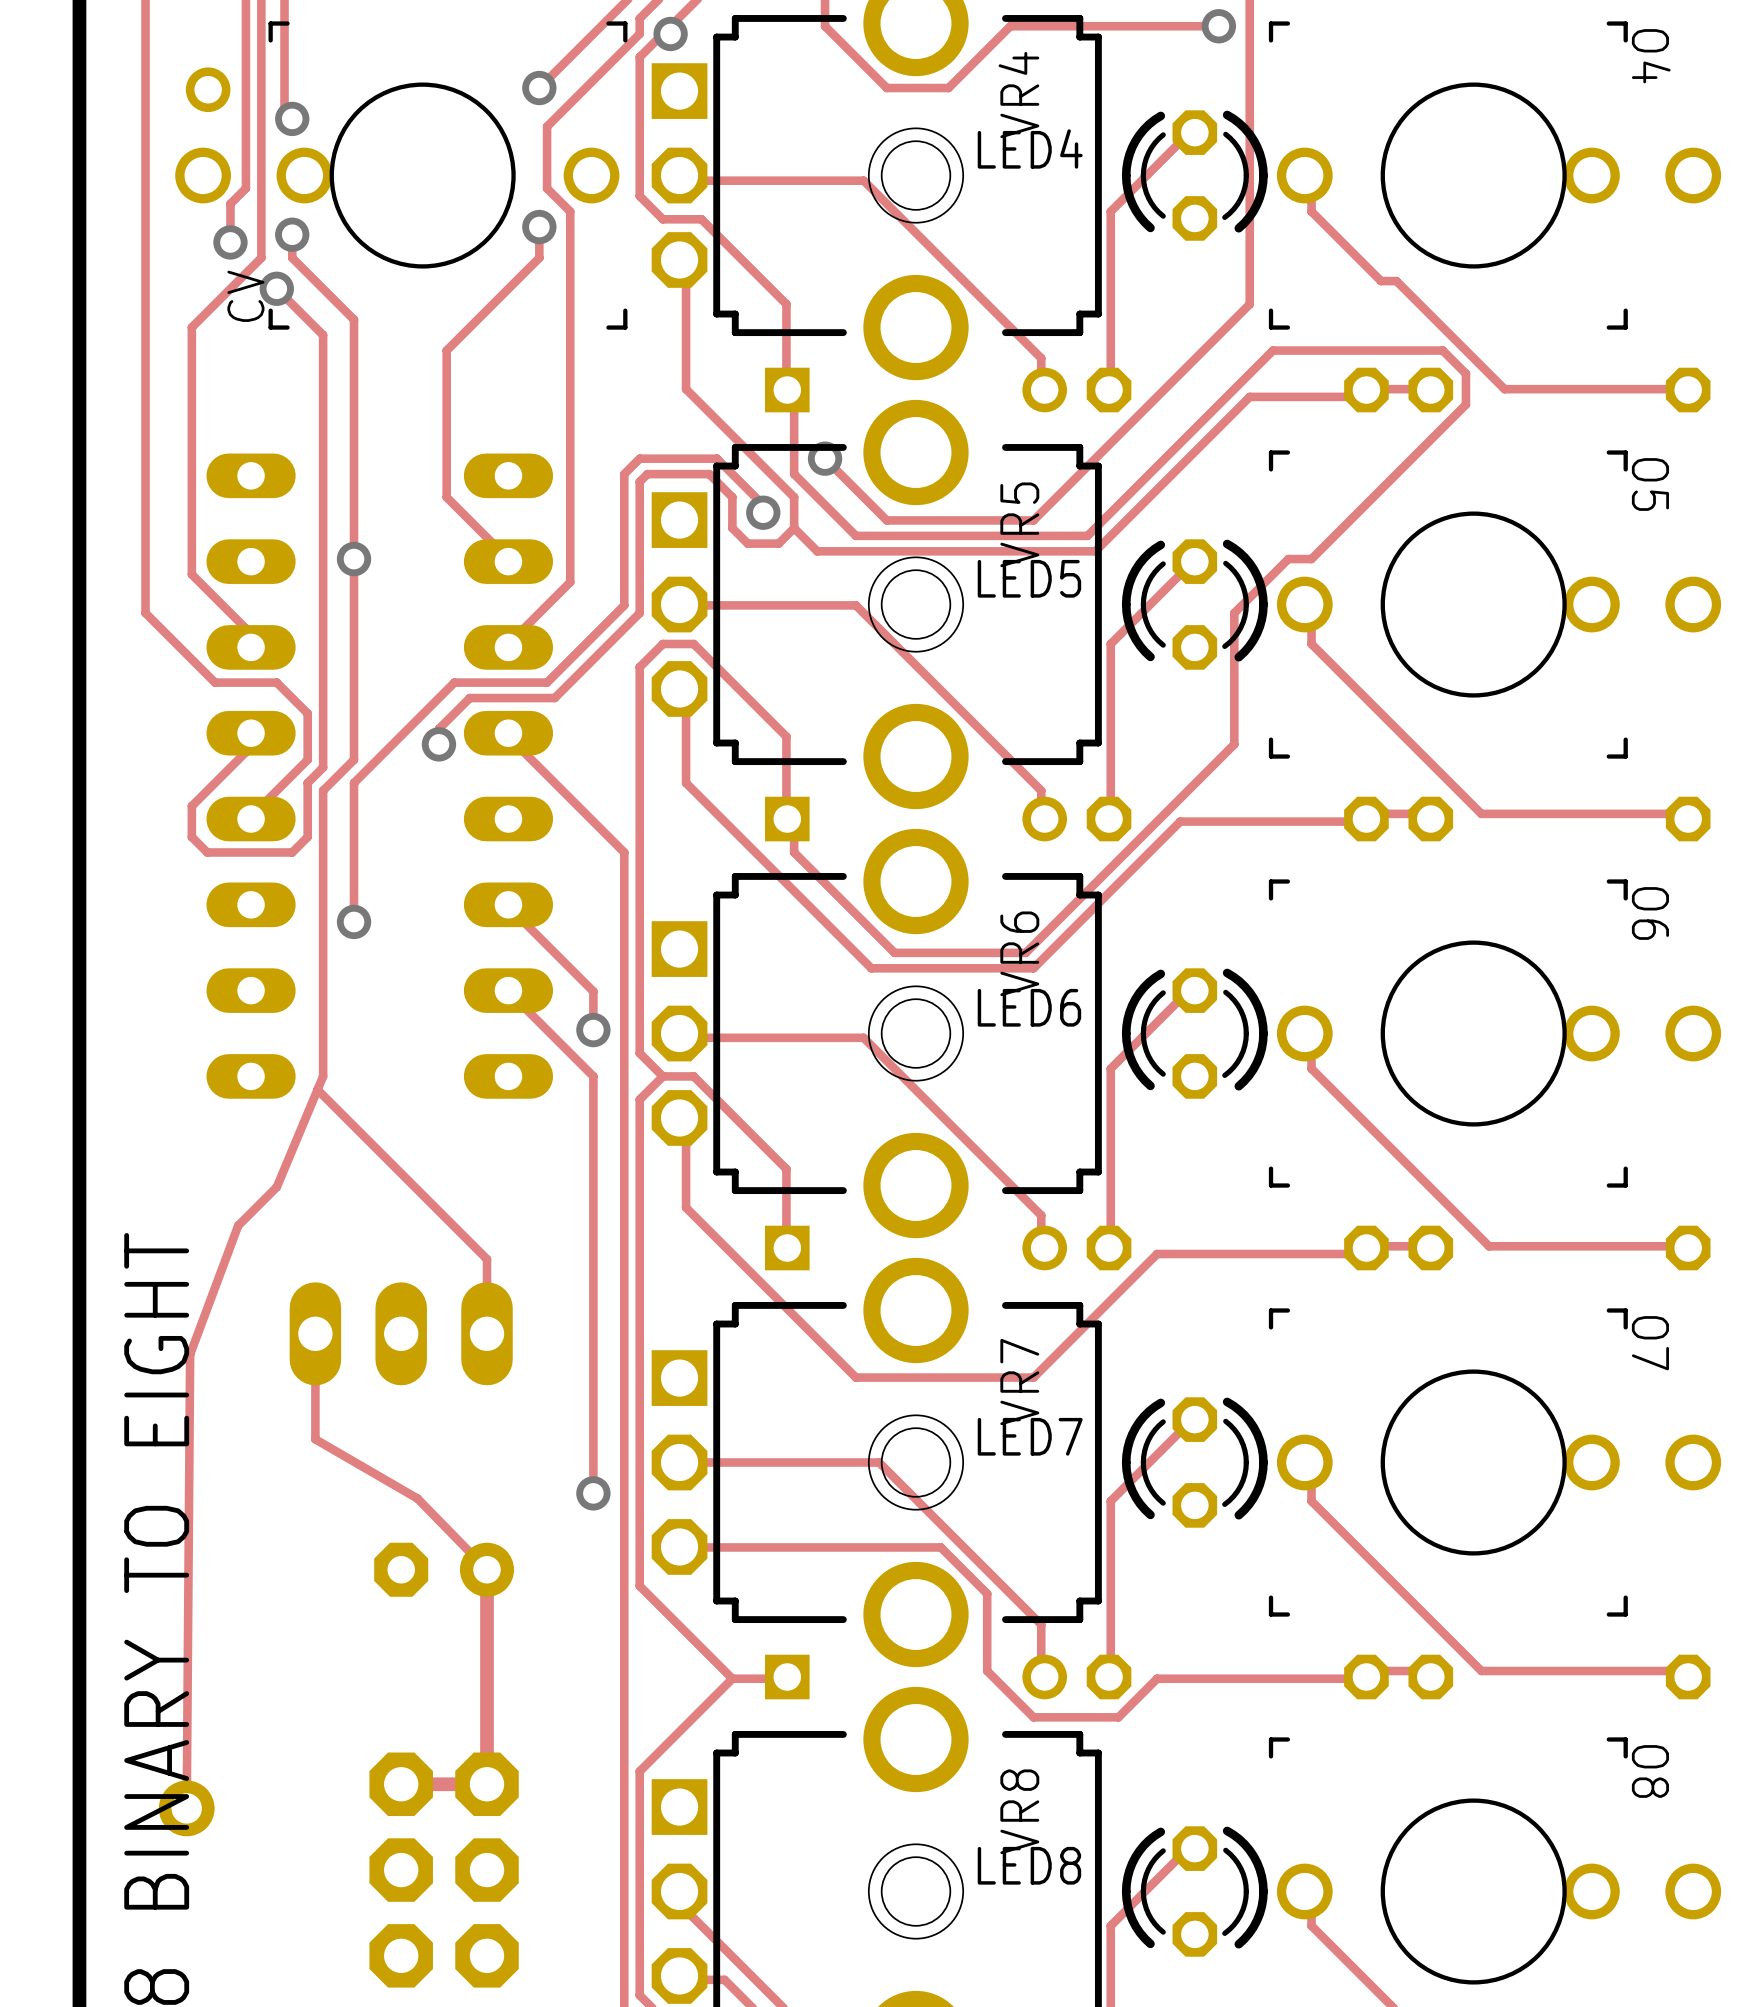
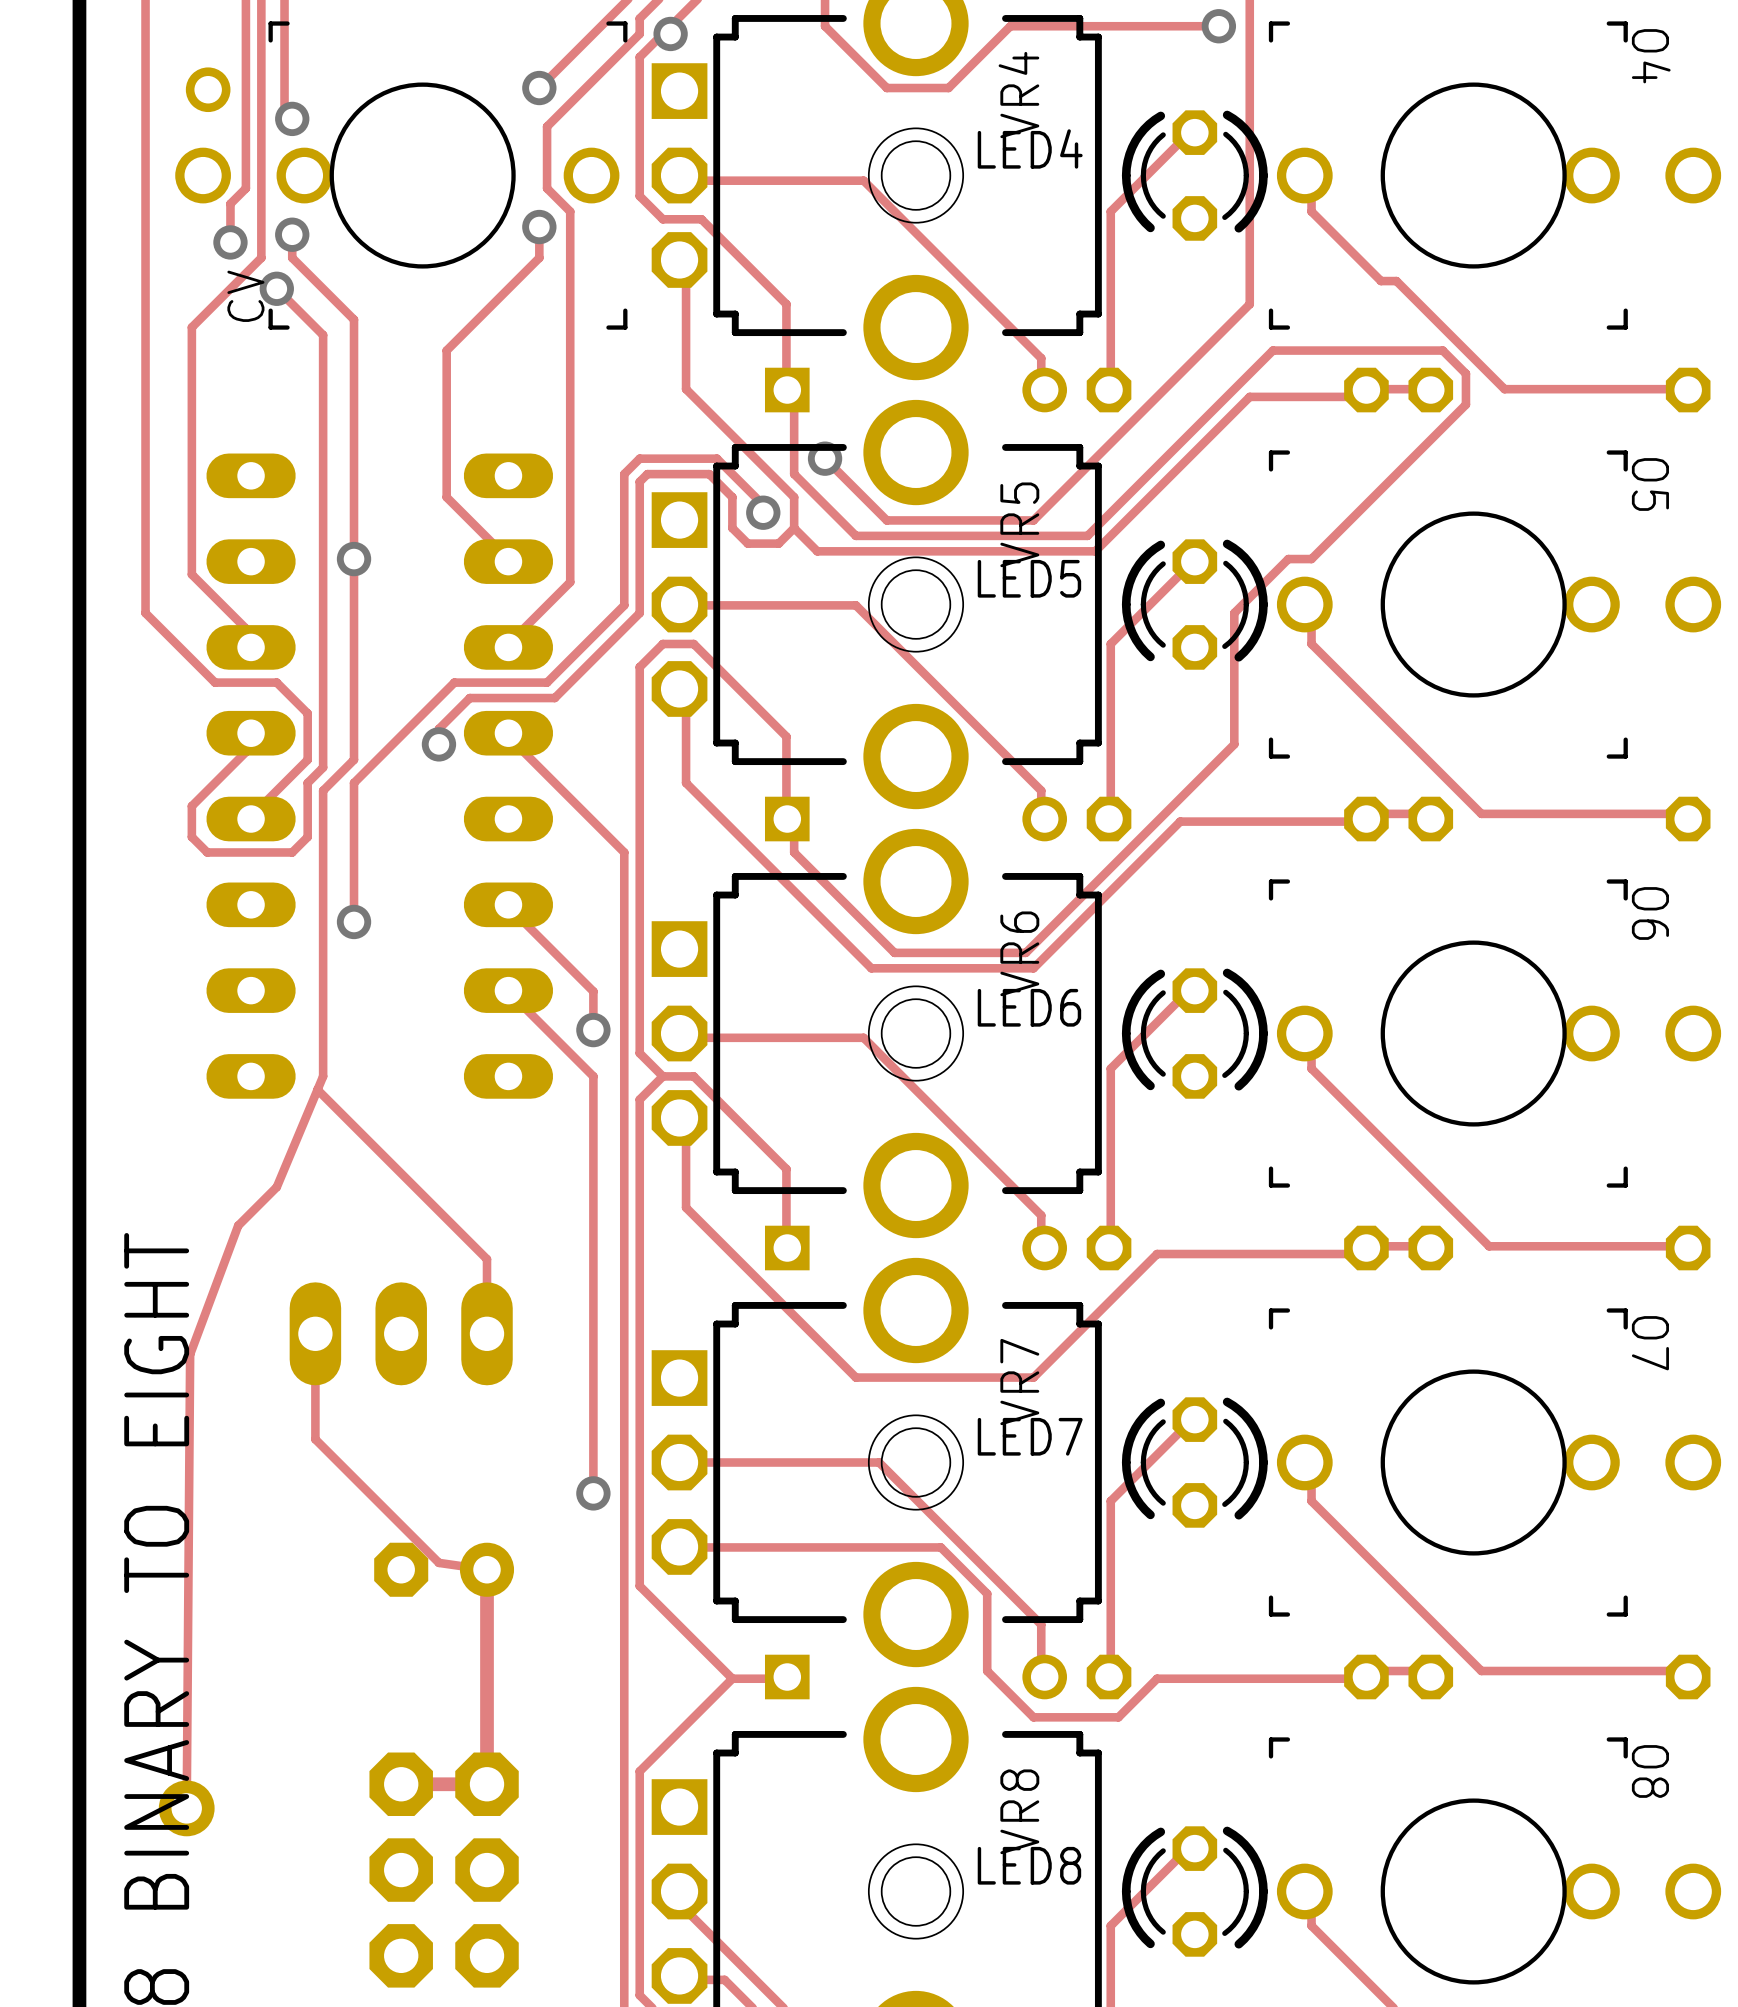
track: (315, 1439) (417, 1498) (487, 1569) -> (315, 1439) (438, 1562) (487, 1569)

